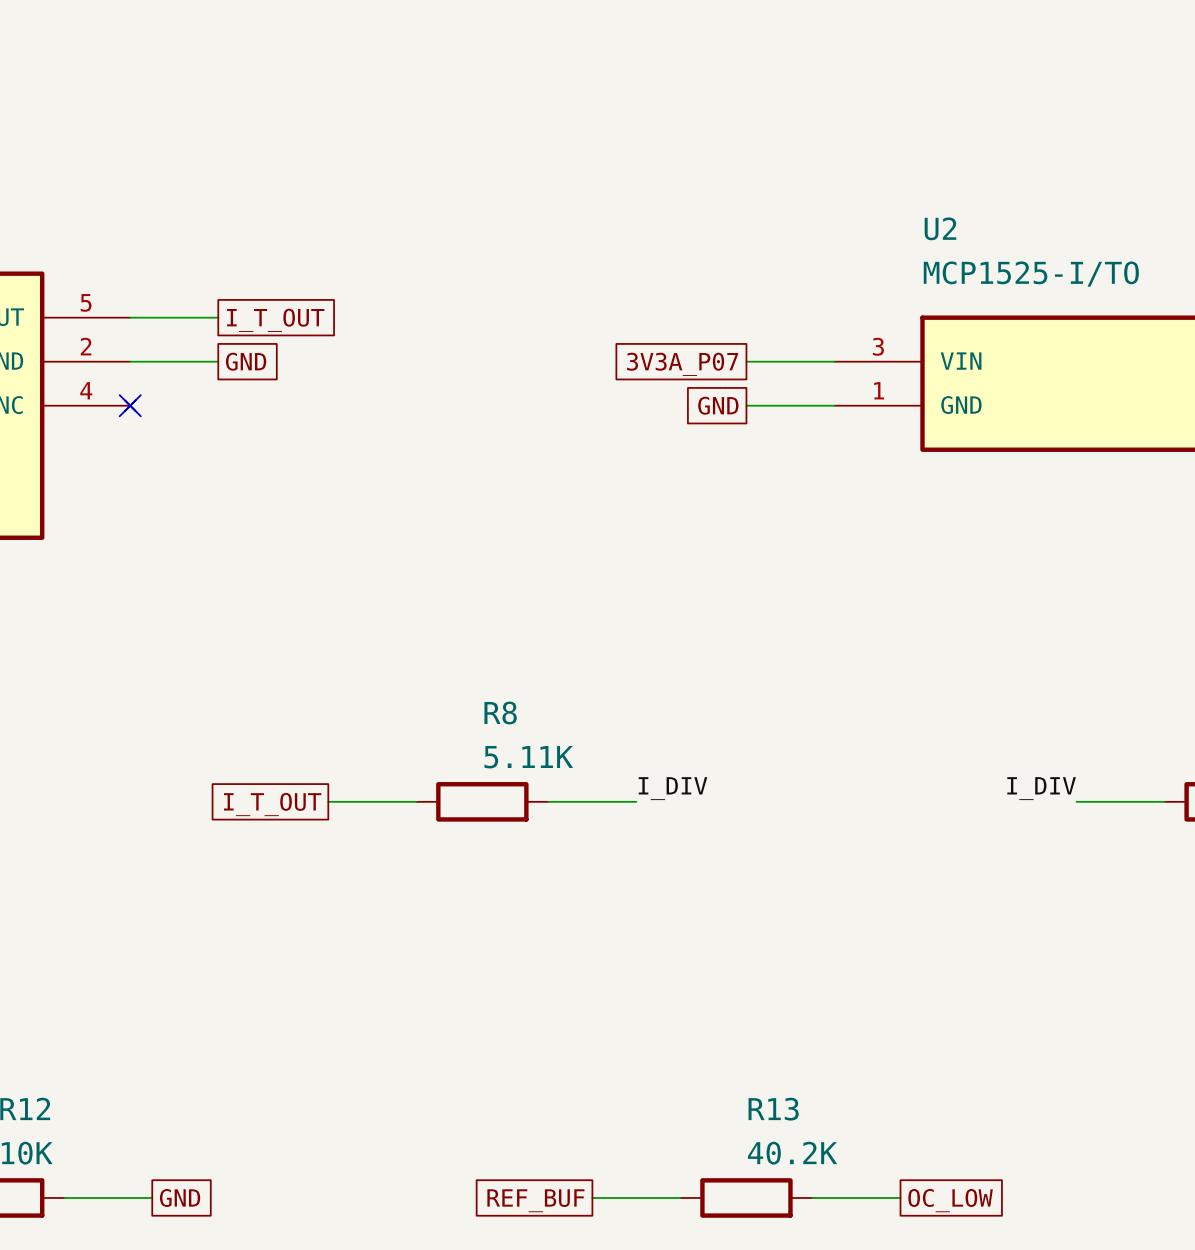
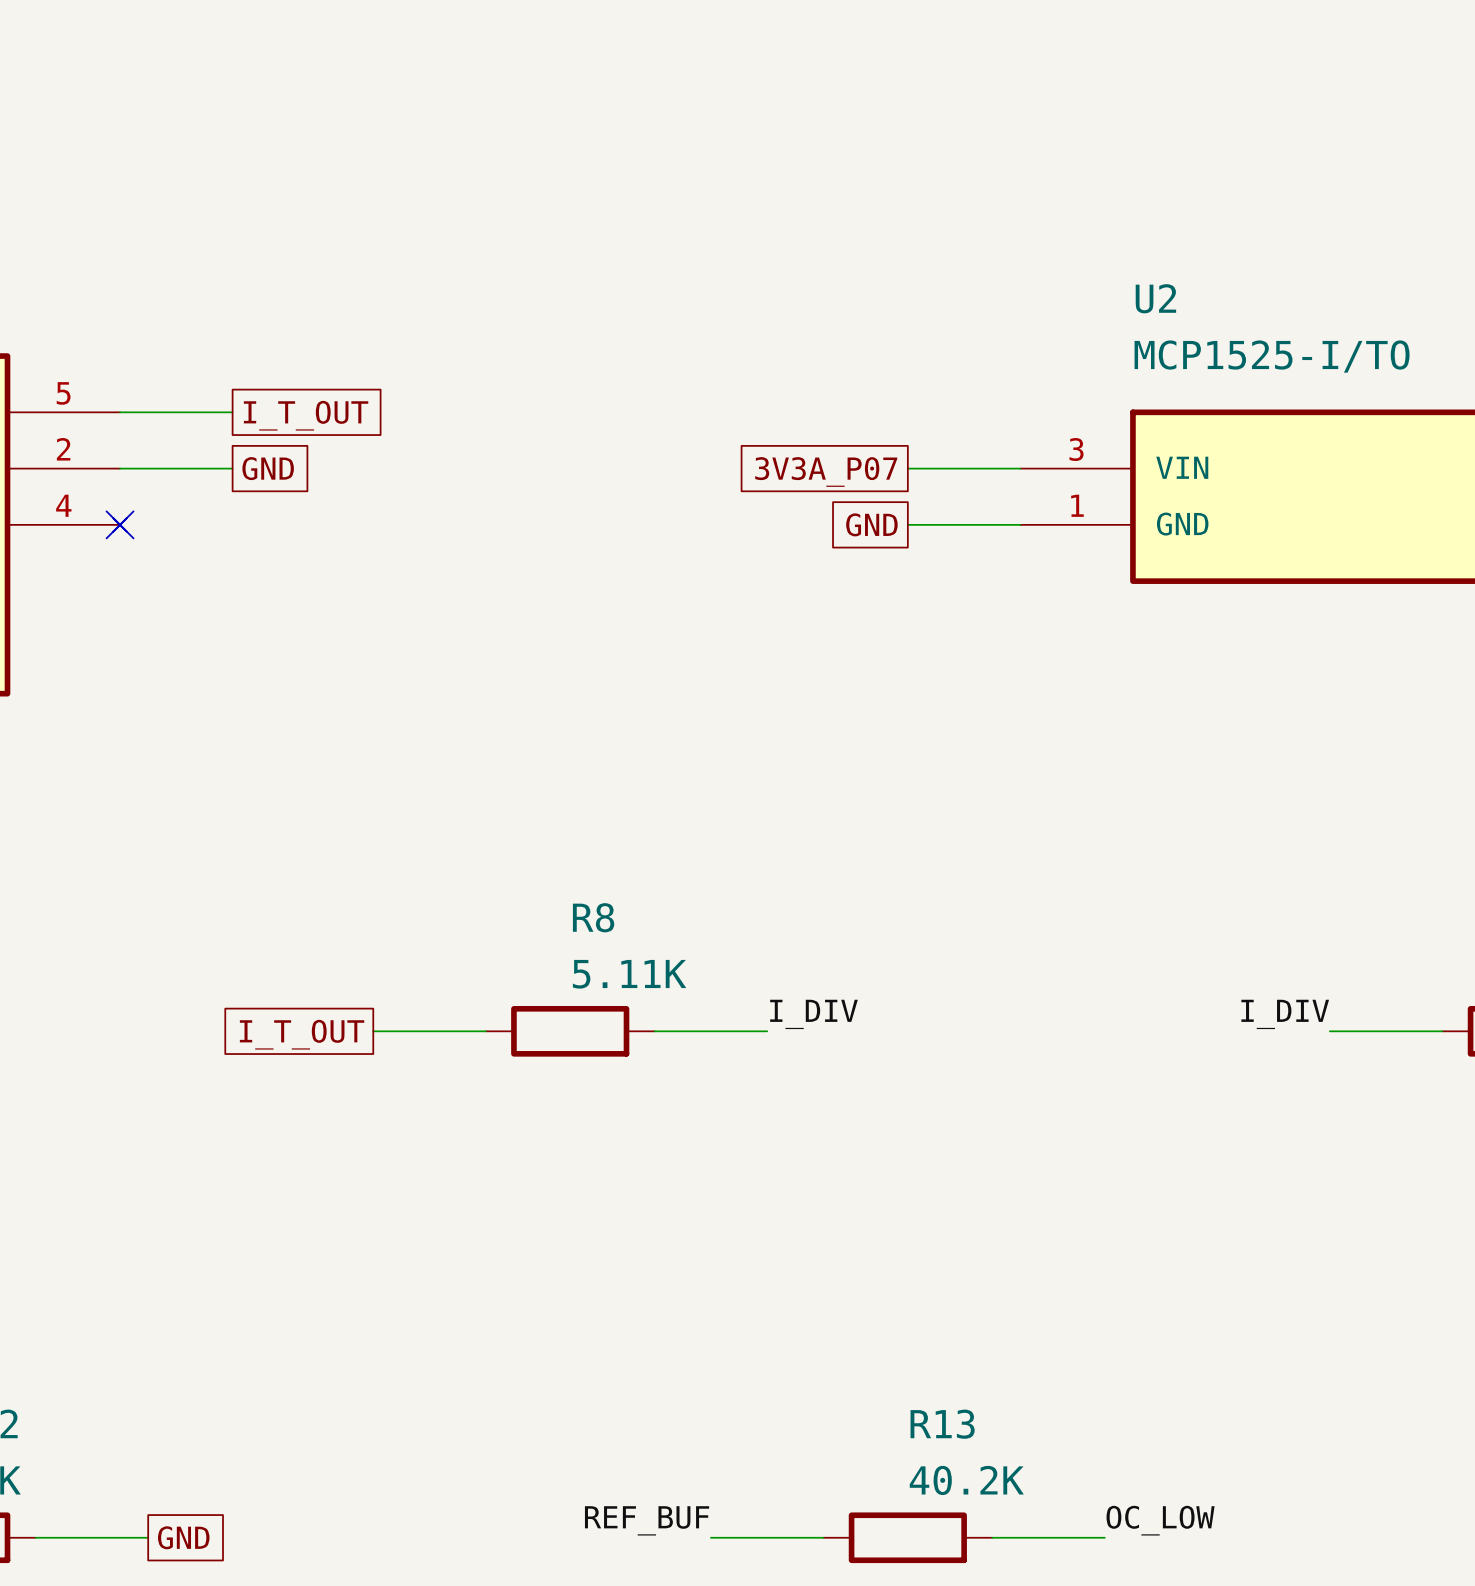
label: none -> REF_BUF (647, 1520)
label: none -> OC_LOW (1160, 1520)
global label: REF_BUF (535, 1200) -> none
global label: OC_LOW (950, 1200) -> none

